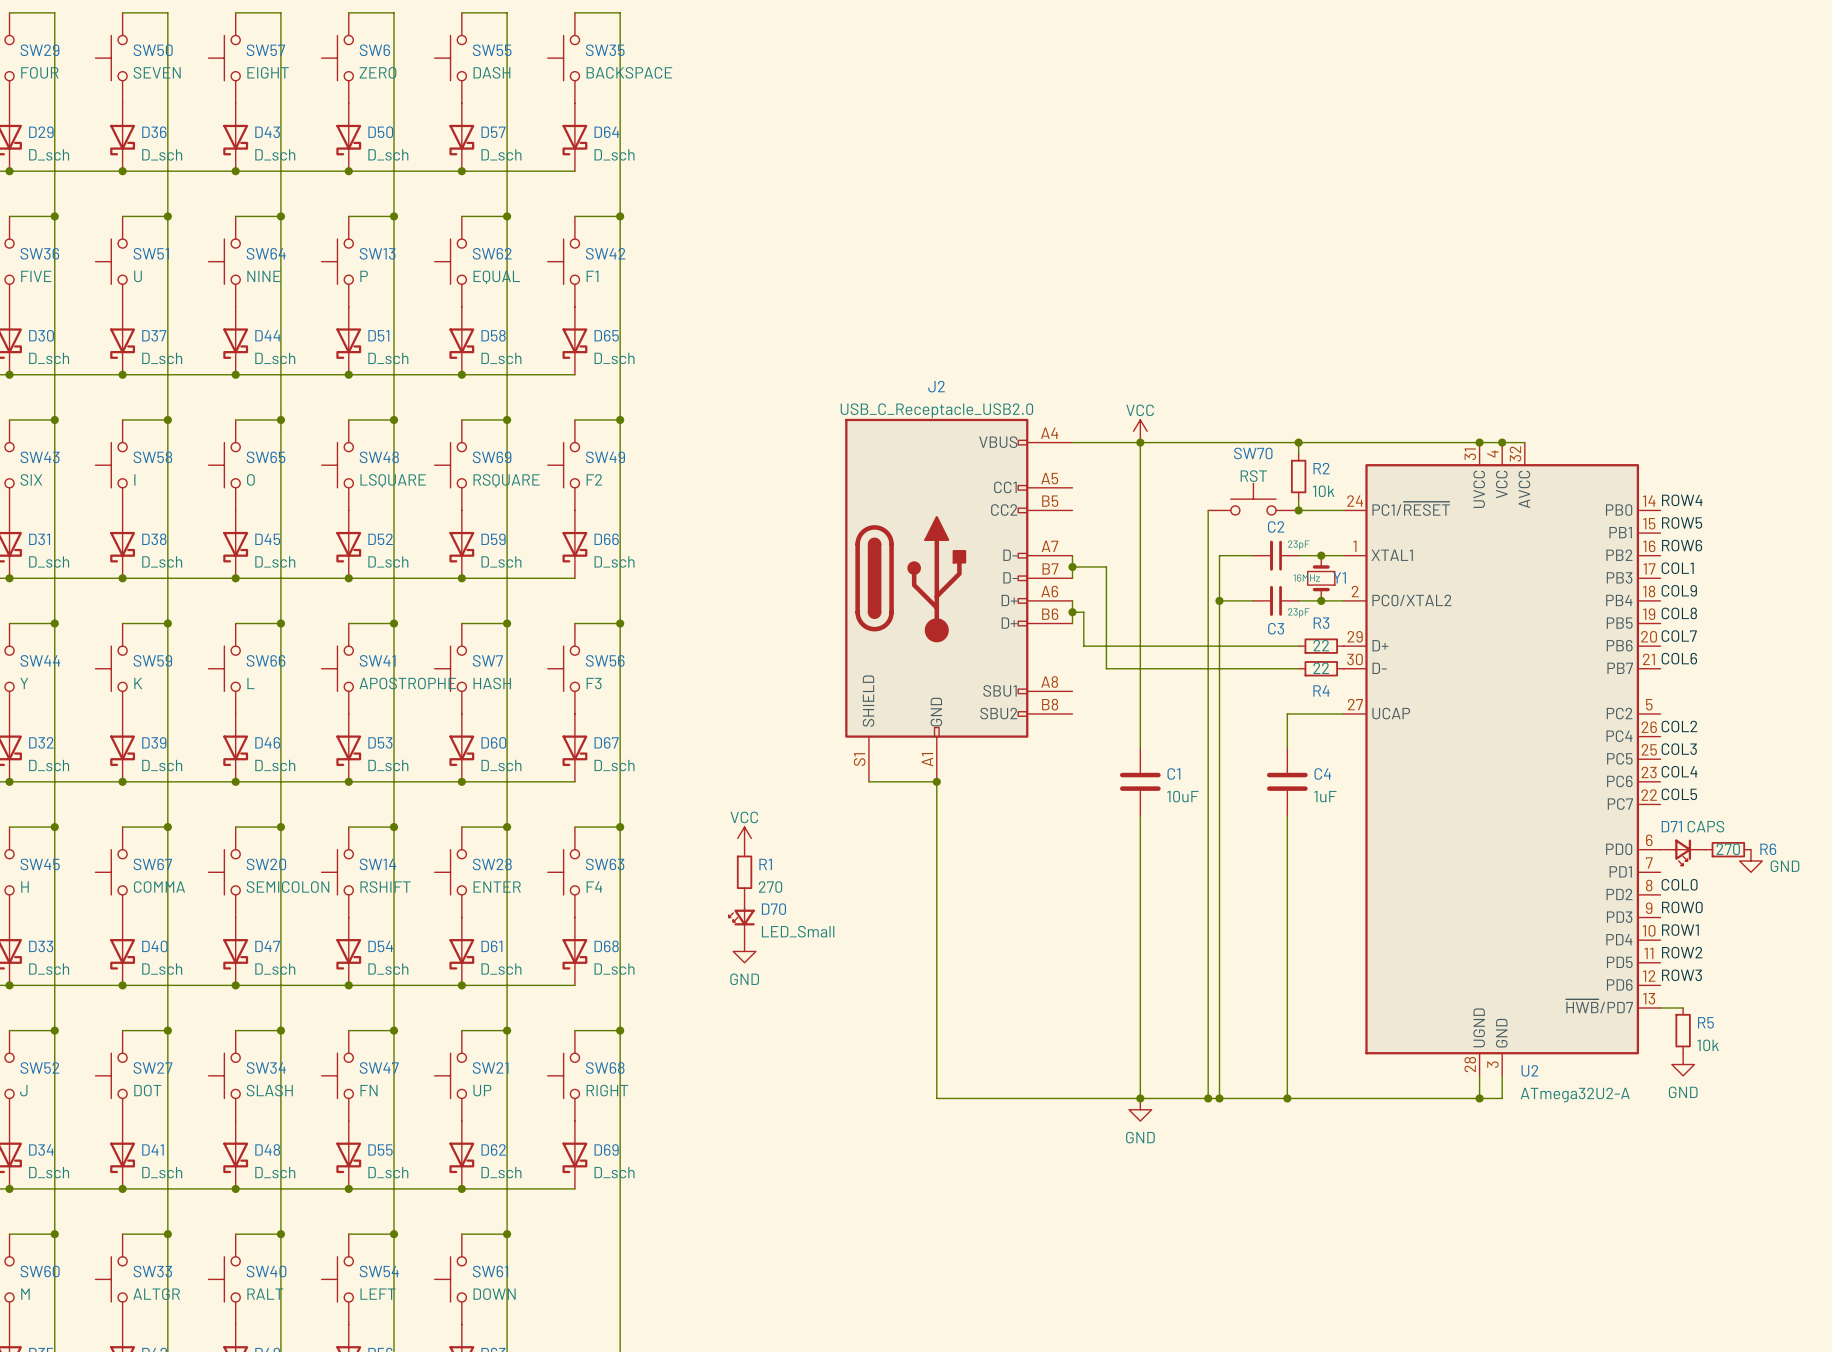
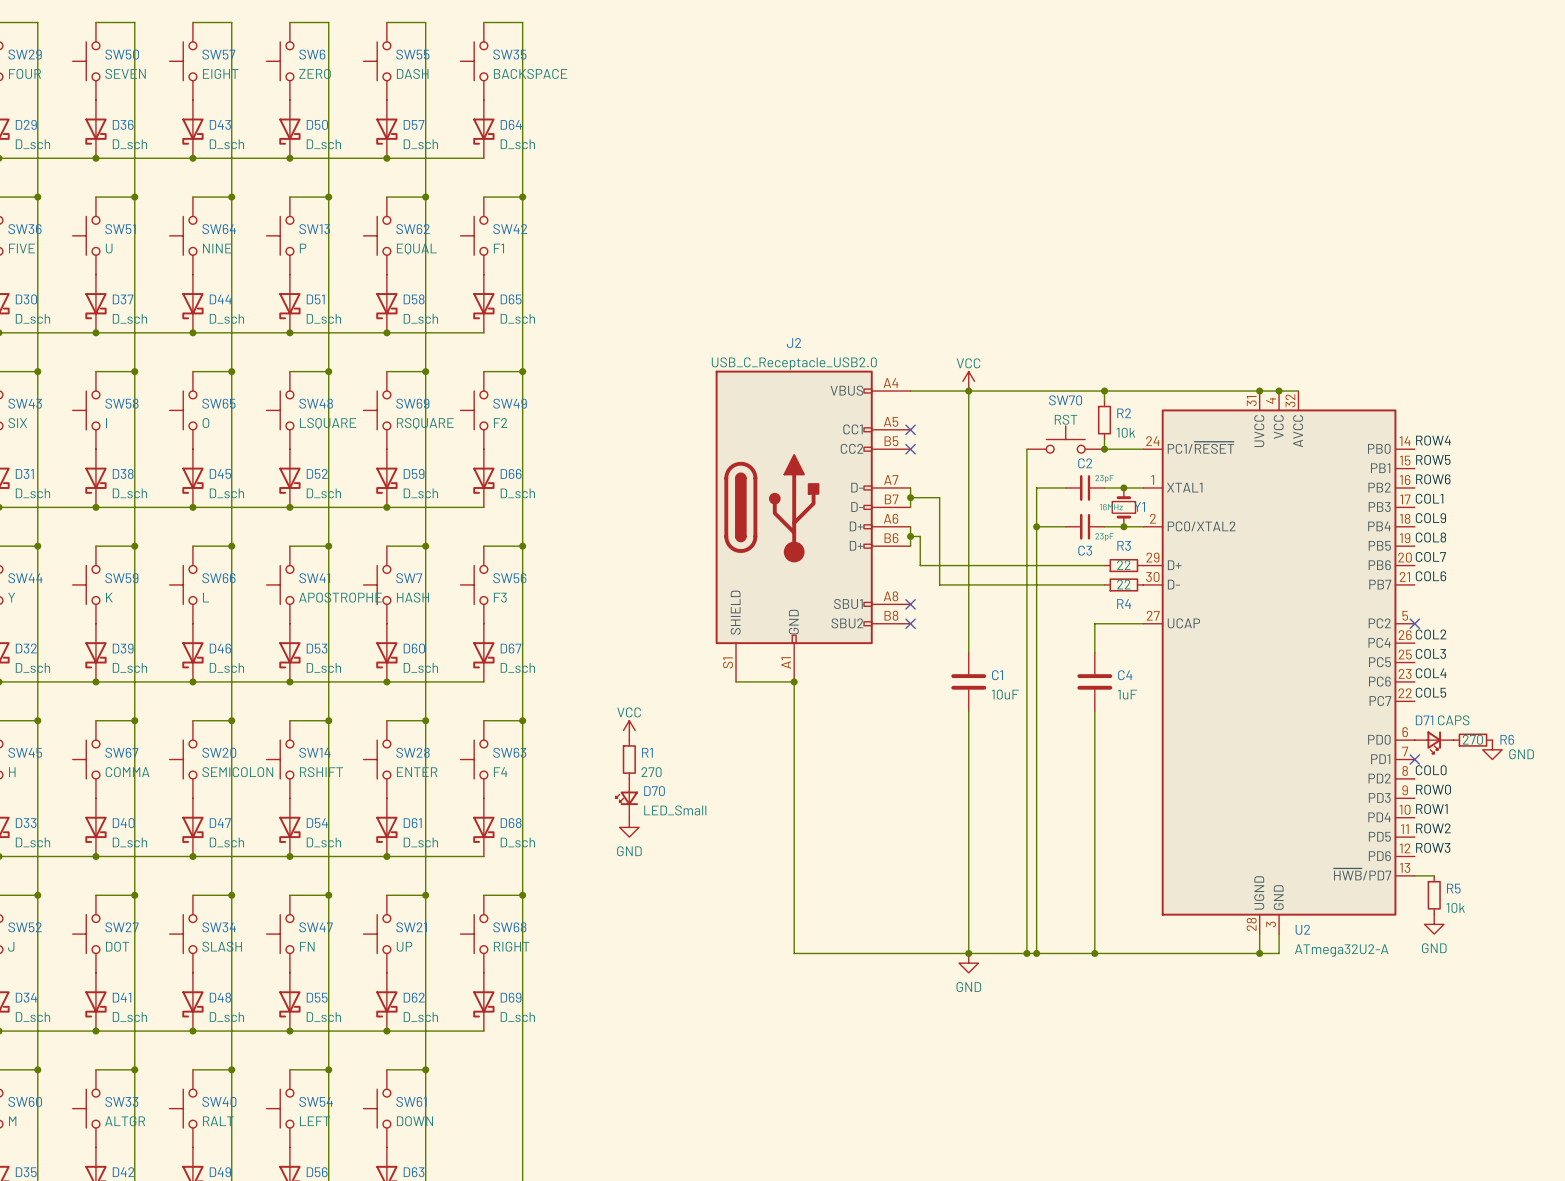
no-connect mark: none -> (910, 429)
no-connect mark: none -> (910, 449)
no-connect mark: none -> (910, 604)
no-connect mark: none -> (910, 623)
no-connect mark: none -> (1414, 623)
no-connect mark: none -> (1414, 759)

